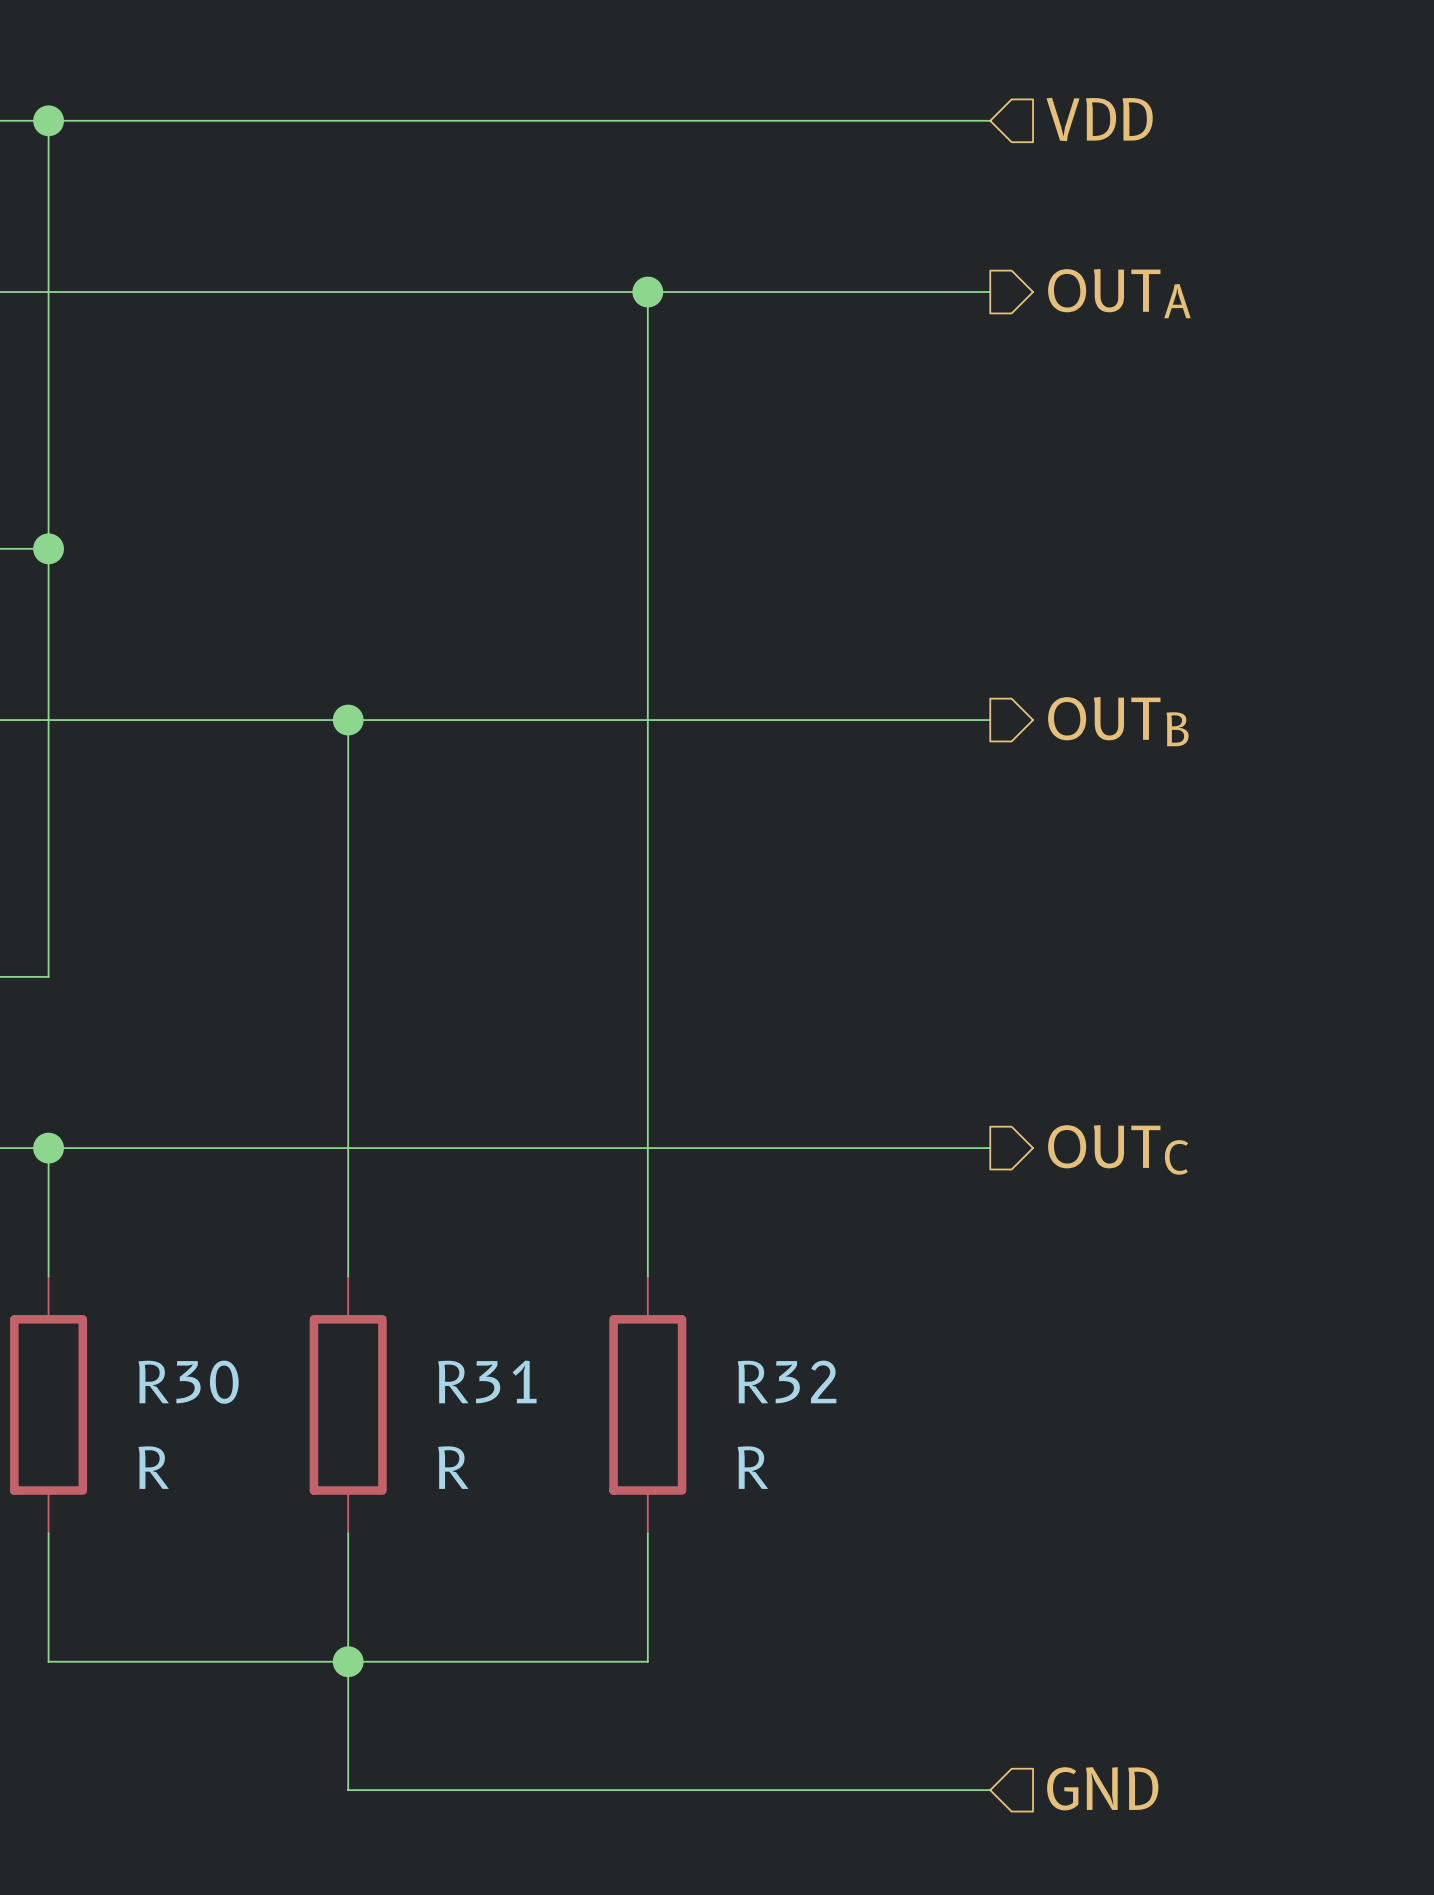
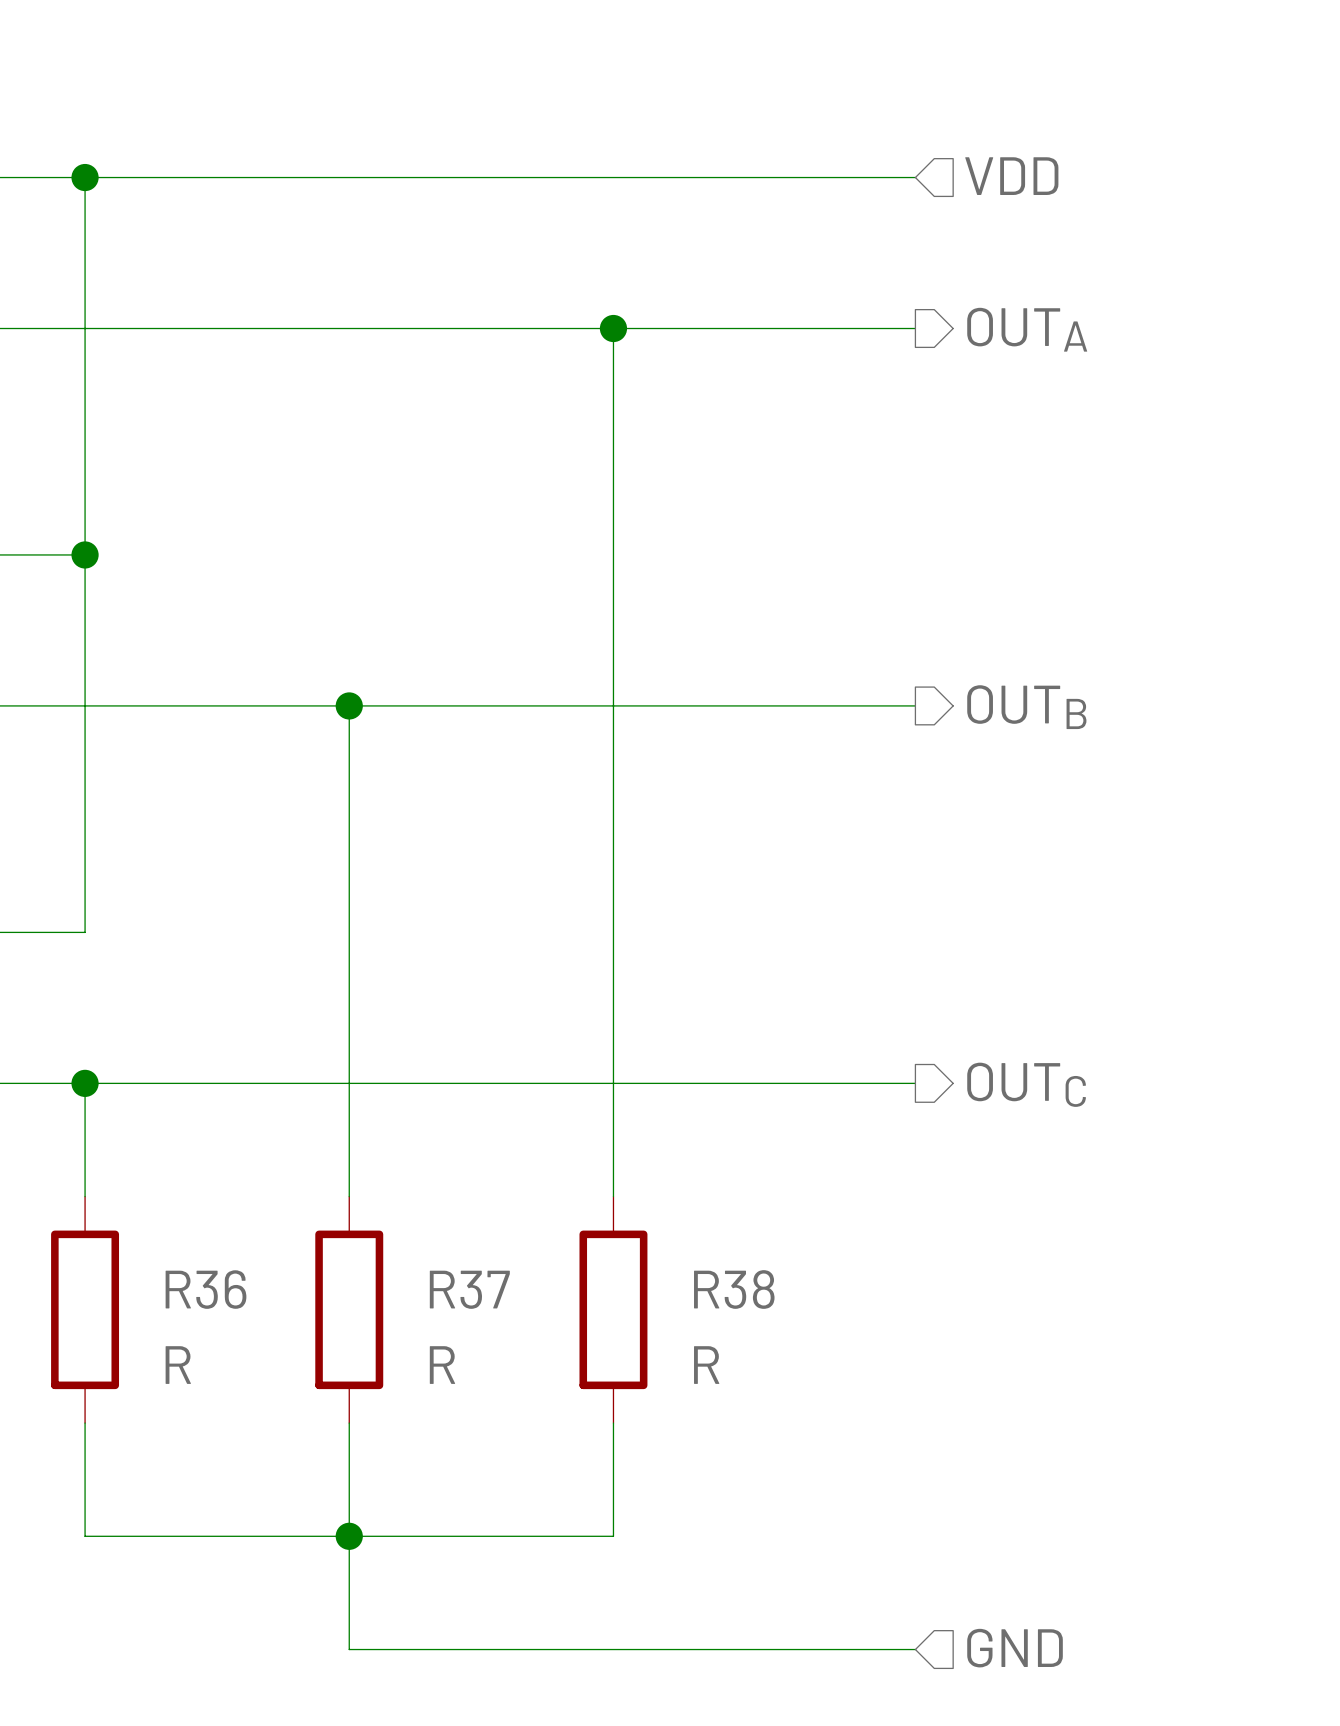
R31 name: R31 (487, 1381) -> R37 (469, 1289)
R32 name: R32 (787, 1381) -> R38 (734, 1289)
R30 name: R30 (188, 1382) -> R36 (205, 1289)

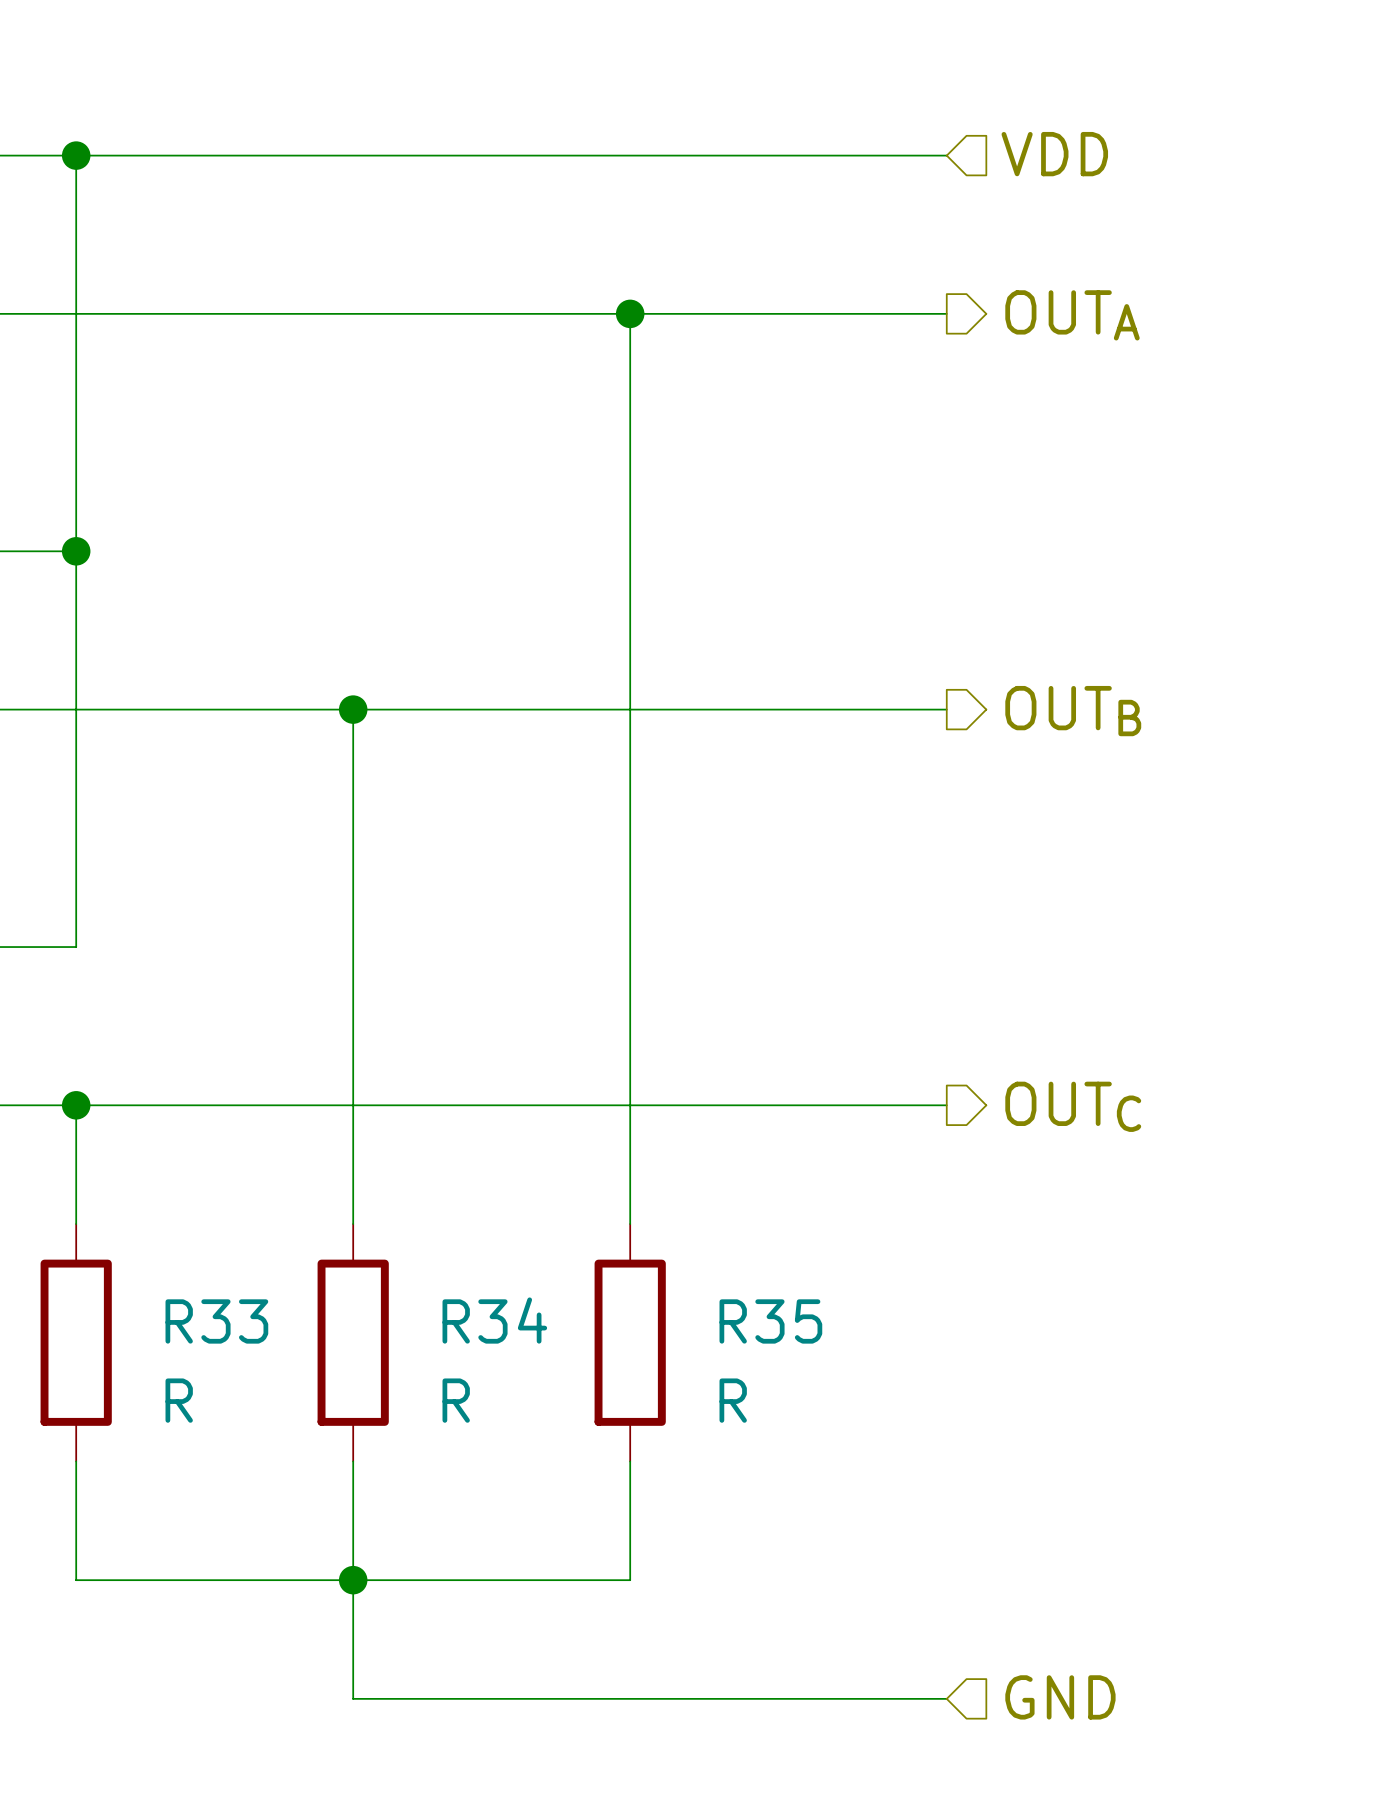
R36 name: R36 (205, 1289) -> R33 (216, 1321)
R37 name: R37 (469, 1289) -> R34 (494, 1320)
R38 name: R38 (734, 1289) -> R35 (770, 1321)

